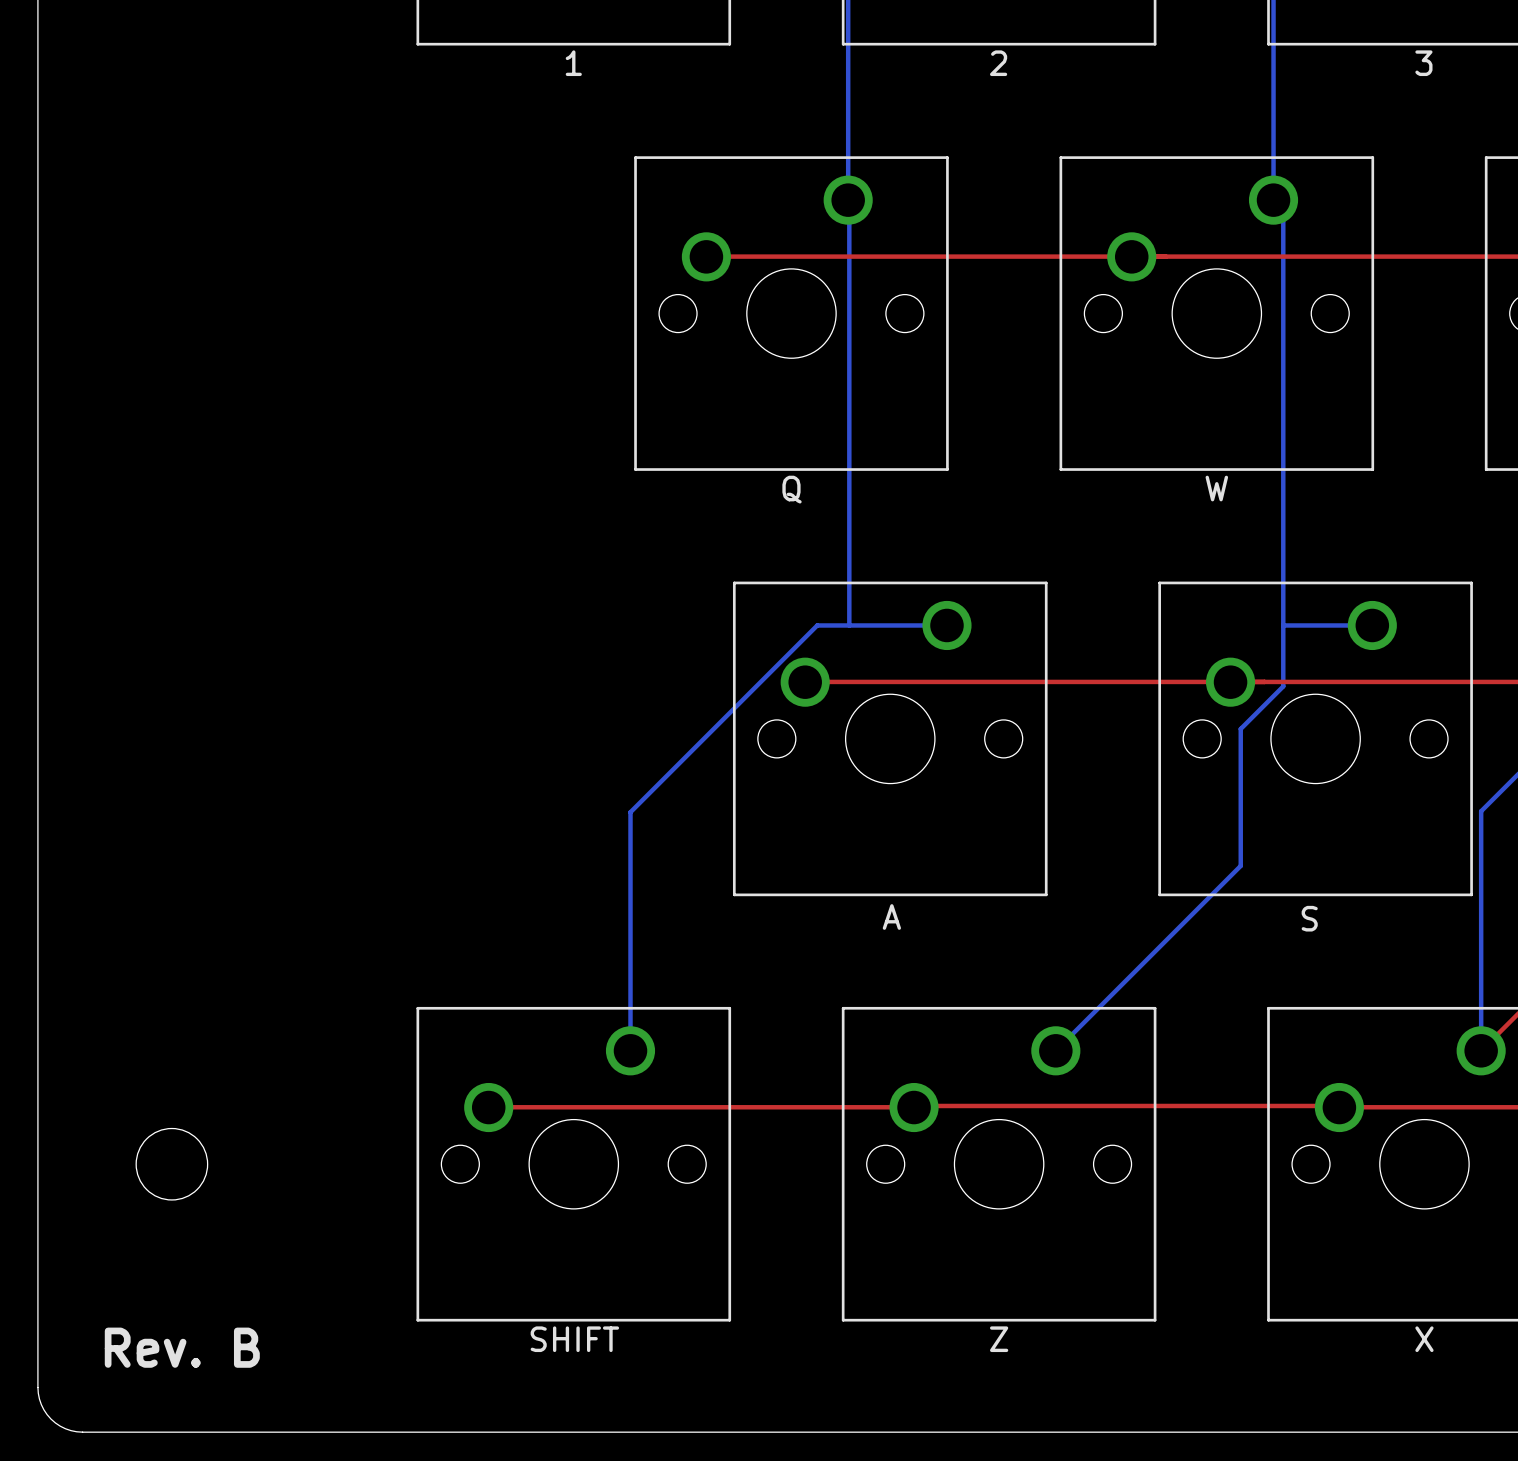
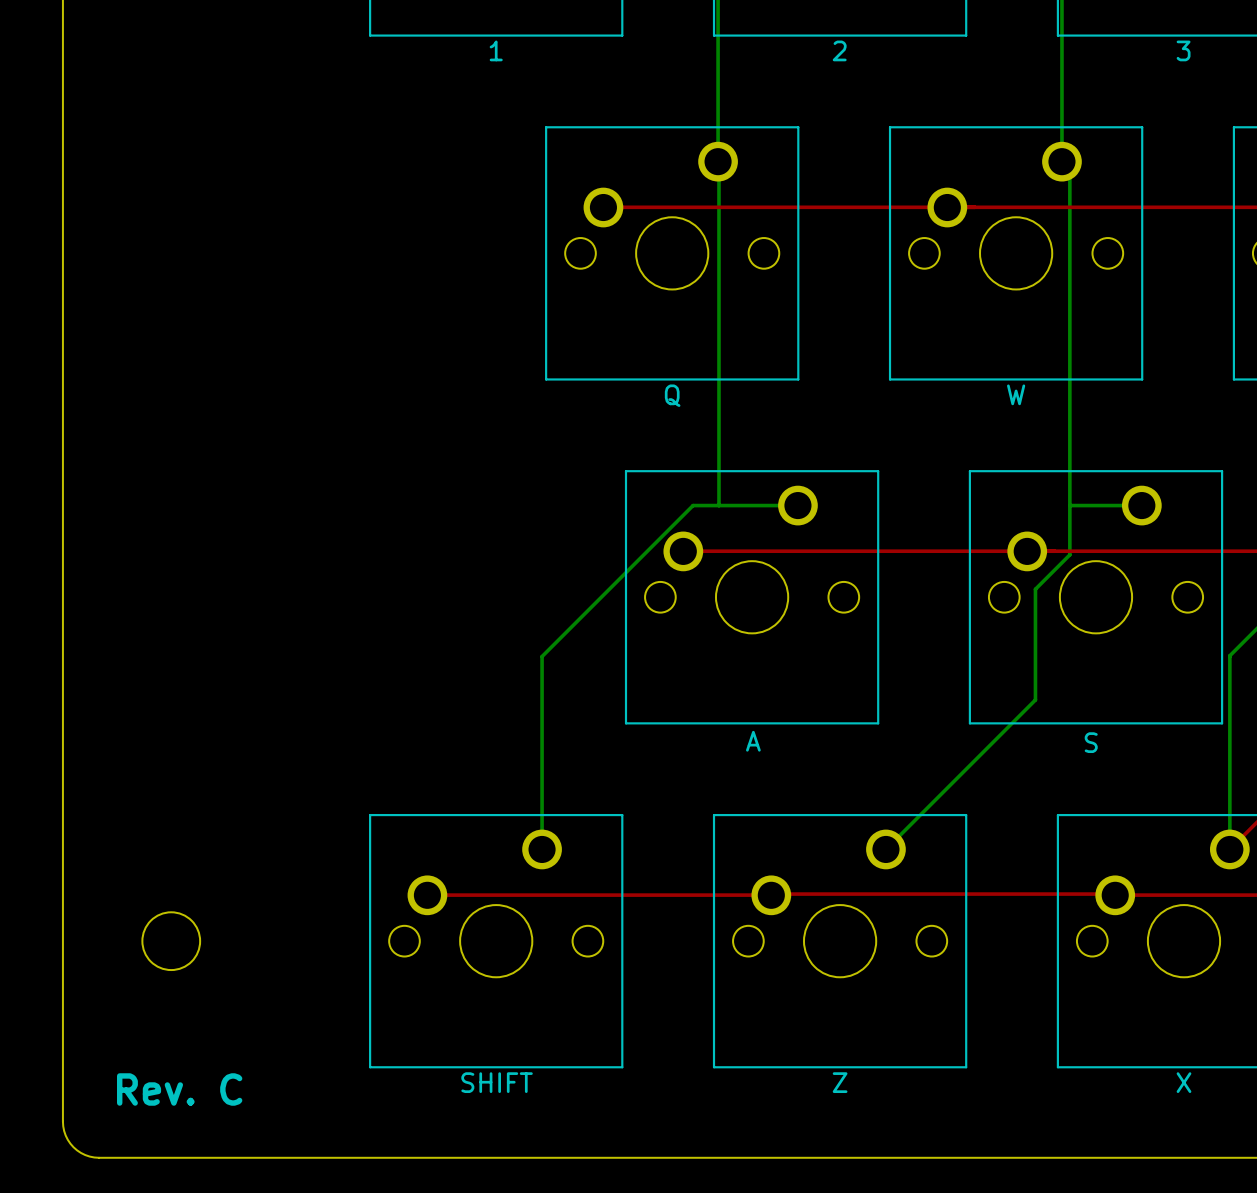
text: Rev. B (182, 1347) -> Rev. C (179, 1089)

